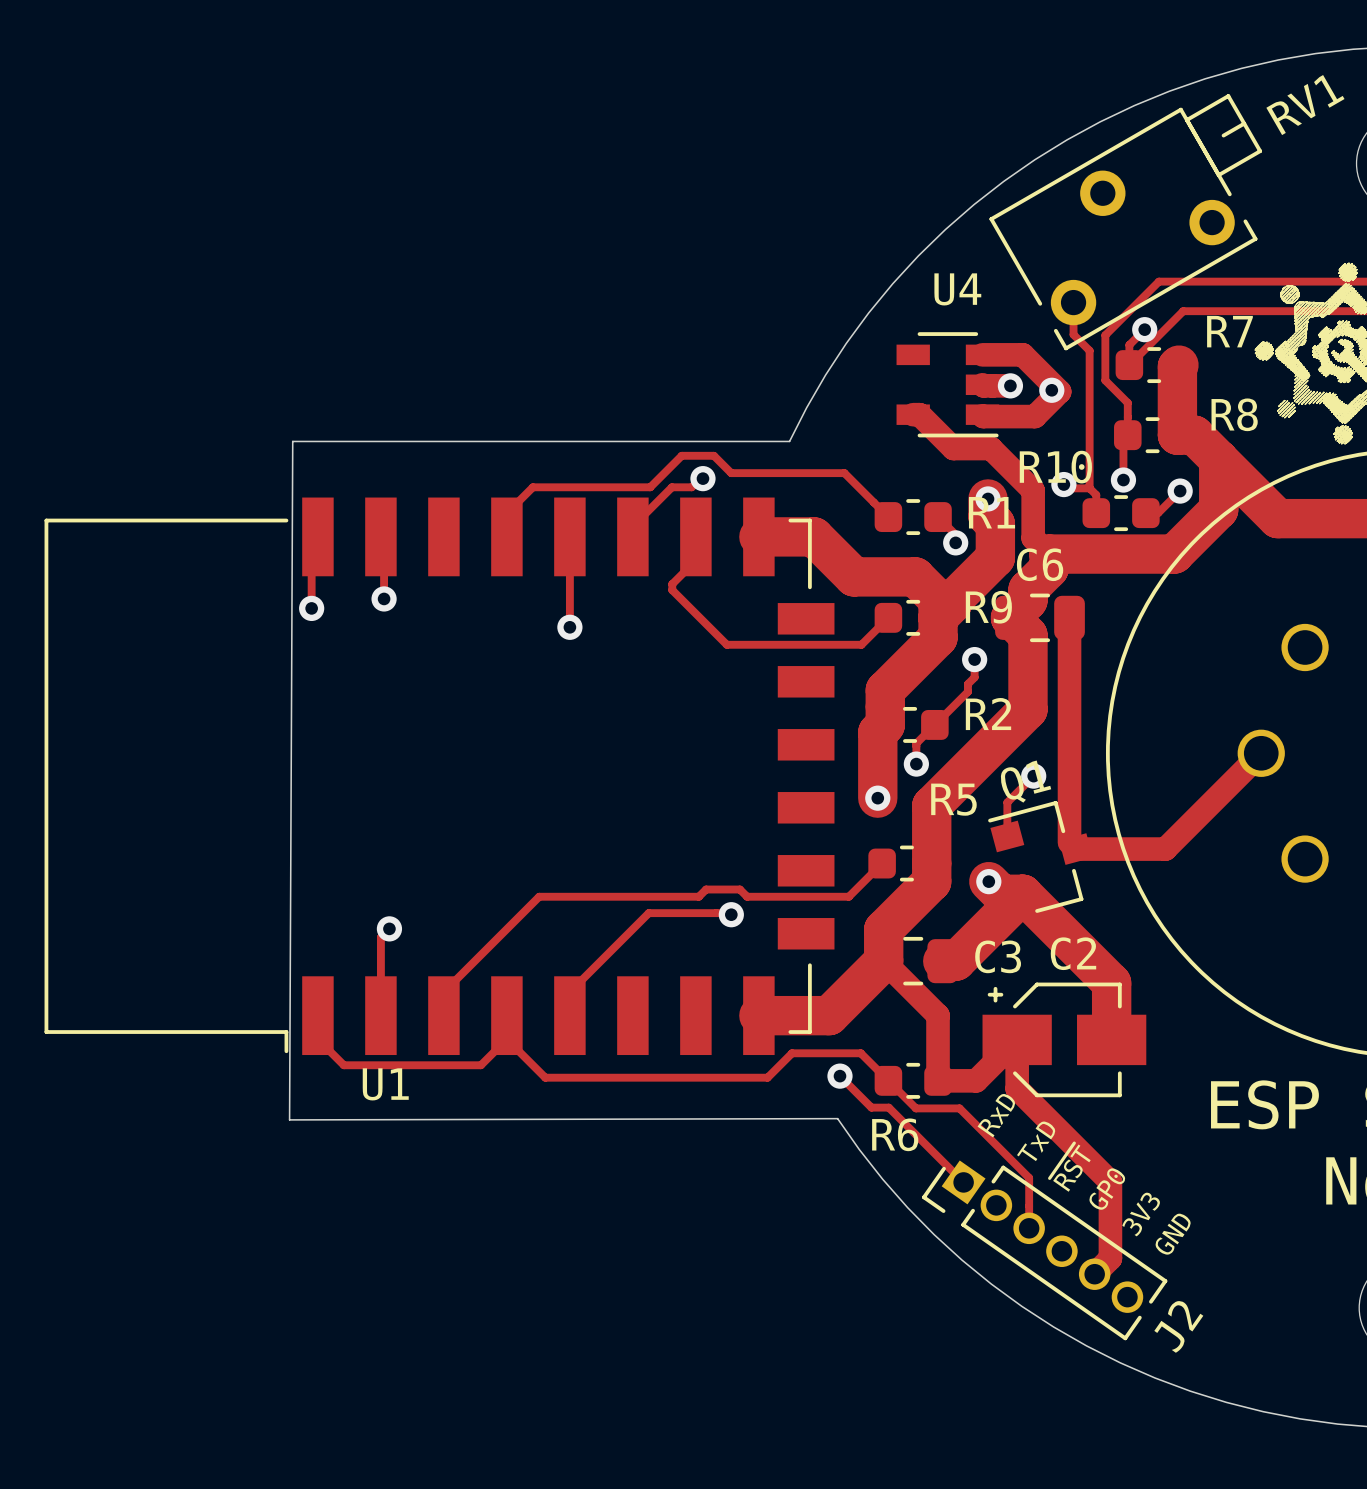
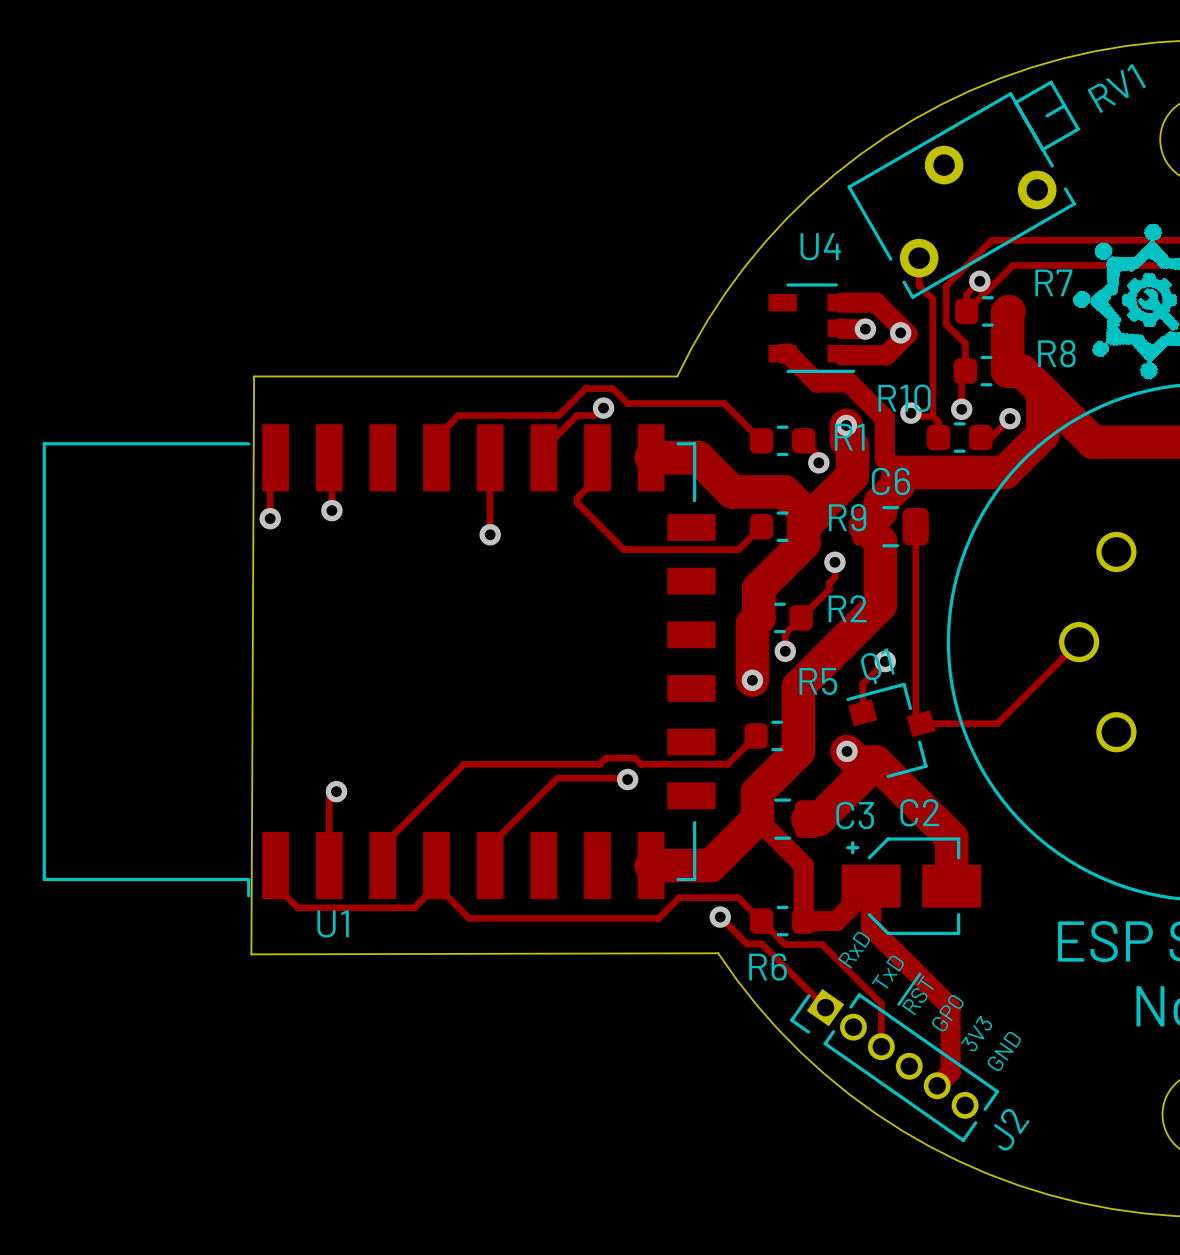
track width: thick (1069, 617) (1069, 842) -> thin (915, 526) (915, 718)
track width: thick (1261, 753) (1165, 849) (1075, 849) -> thin (1079, 642) (997, 723) (921, 723)

